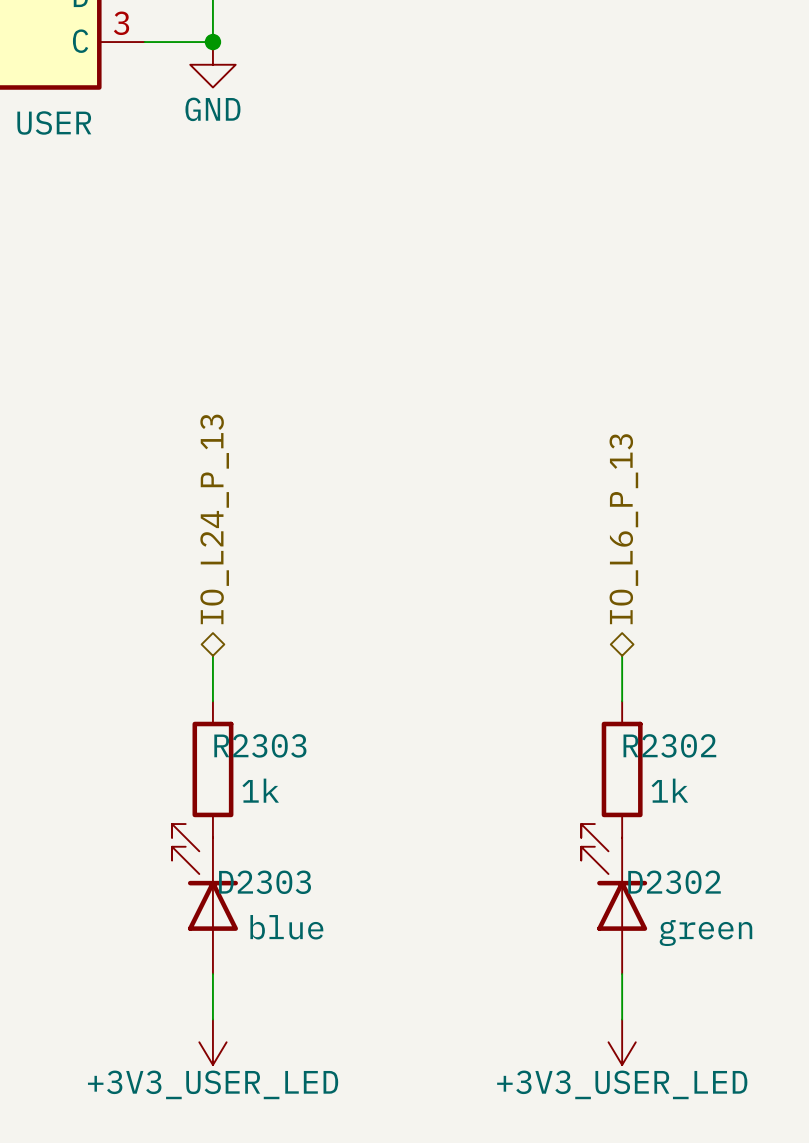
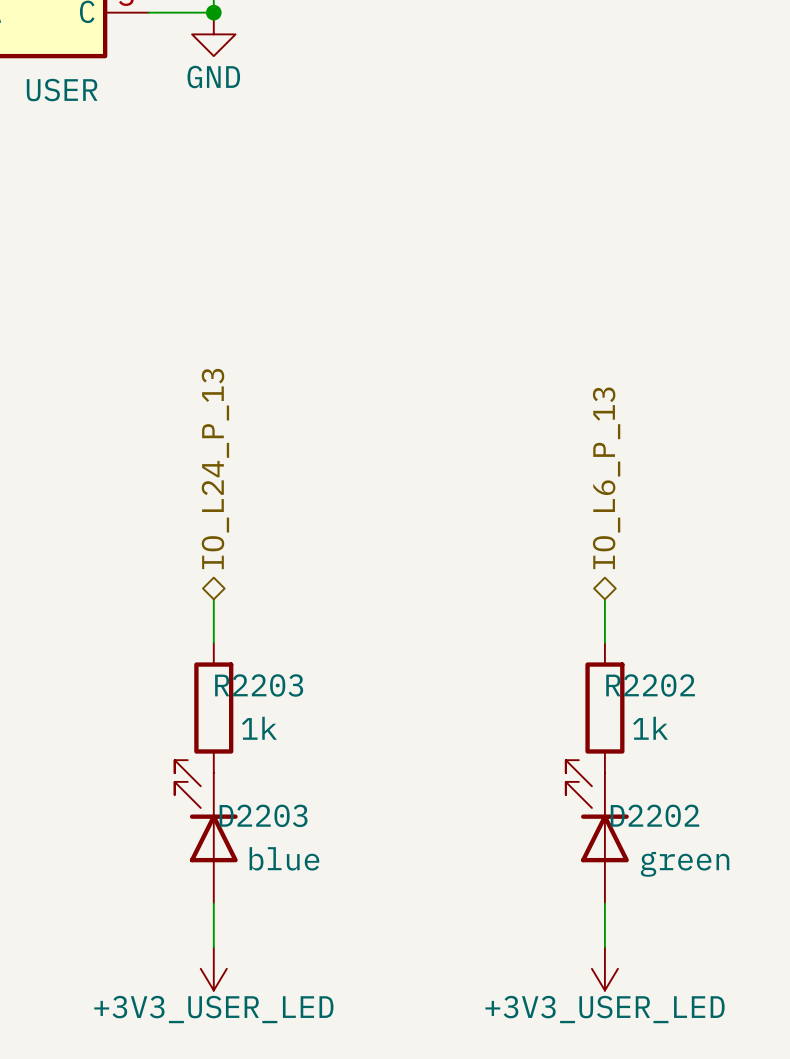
R2303 name: R2303 (260, 745) -> R2203 (259, 685)
R2302 name: R2302 (669, 745) -> R2202 (650, 685)
D2303 name: D2303 (265, 882) -> D2203 (263, 815)
D2302 name: D2302 (674, 882) -> D2202 (655, 815)

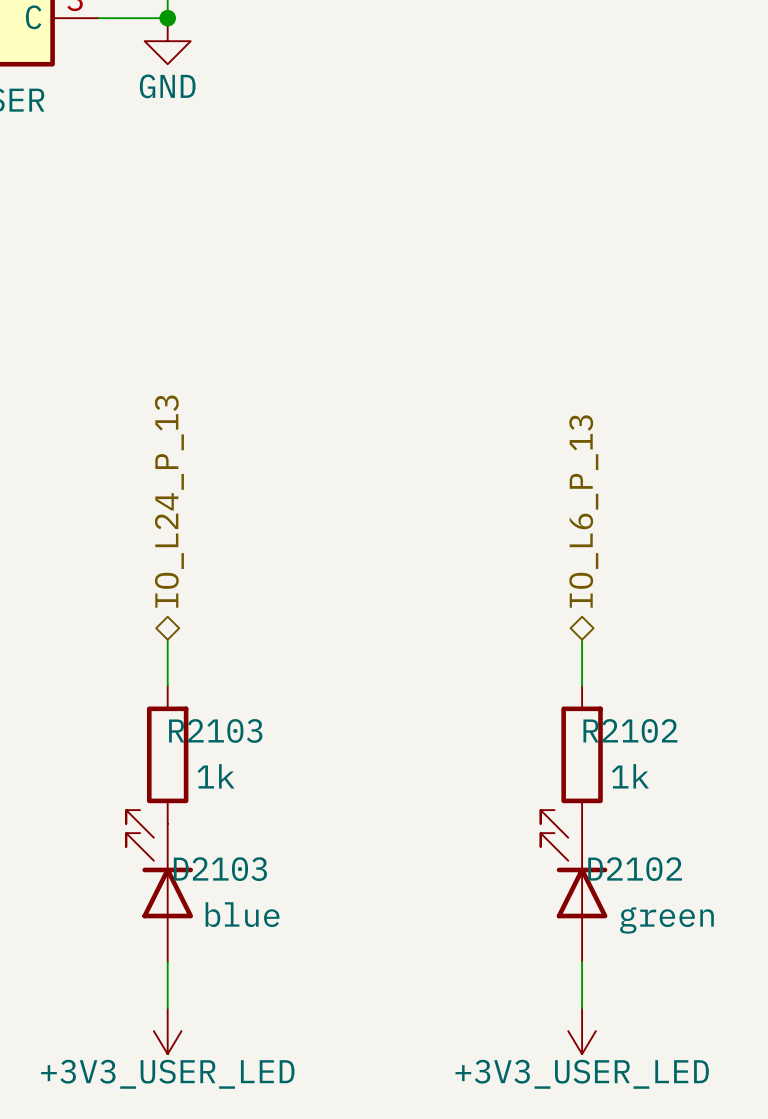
R2203 name: R2203 (259, 685) -> R2103 (215, 730)
R2202 name: R2202 (650, 685) -> R2102 (630, 730)
D2203 name: D2203 (263, 815) -> D2103 (220, 869)
D2202 name: D2202 (655, 815) -> D2102 (635, 869)

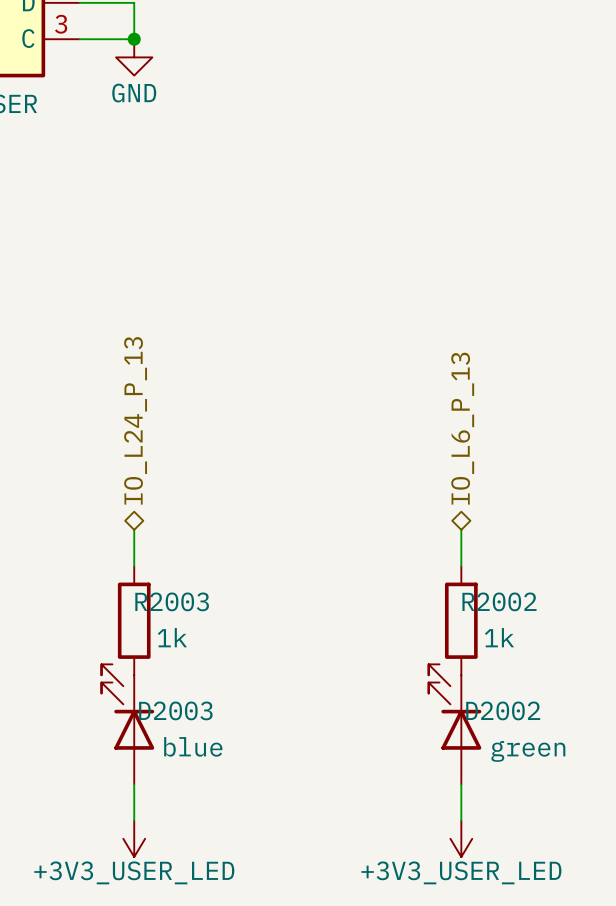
R2103 name: R2103 (215, 730) -> R2003 (172, 601)
R2102 name: R2102 (630, 730) -> R2002 (499, 601)
D2103 name: D2103 (220, 869) -> D2003 (175, 710)
D2102 name: D2102 (635, 869) -> D2002 (503, 710)

